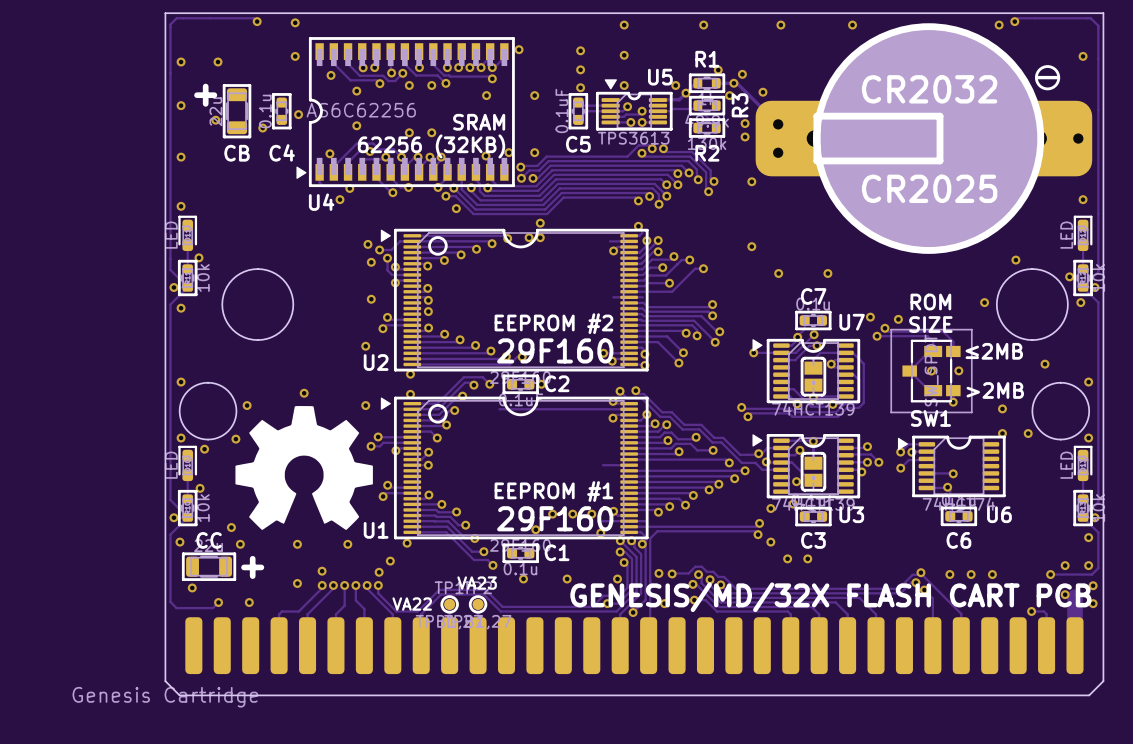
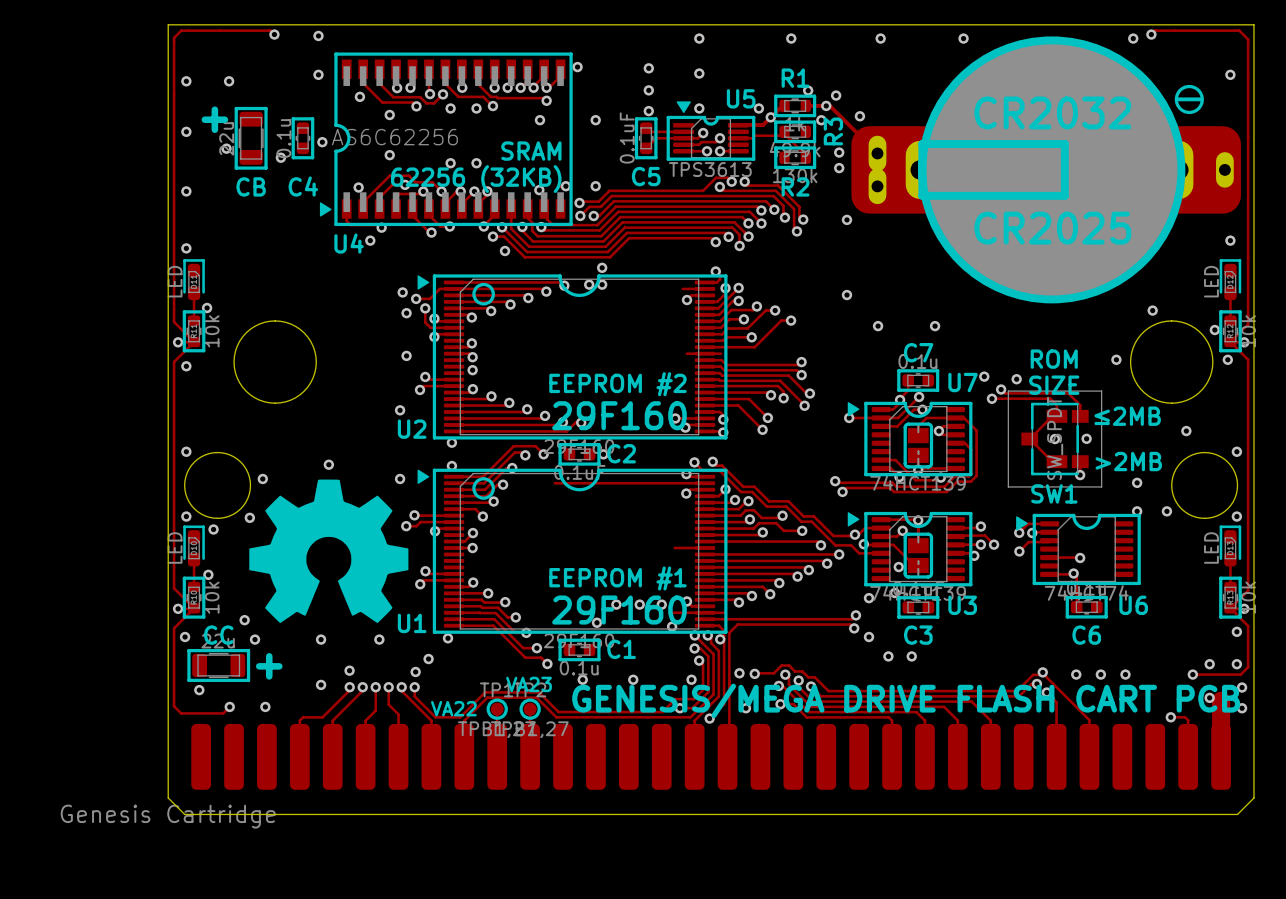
text: GENESIS/MD/32X FLASH CART PCB (830, 597) -> GENESIS/MEGA DRIVE FLASH CART PCB (906, 700)

